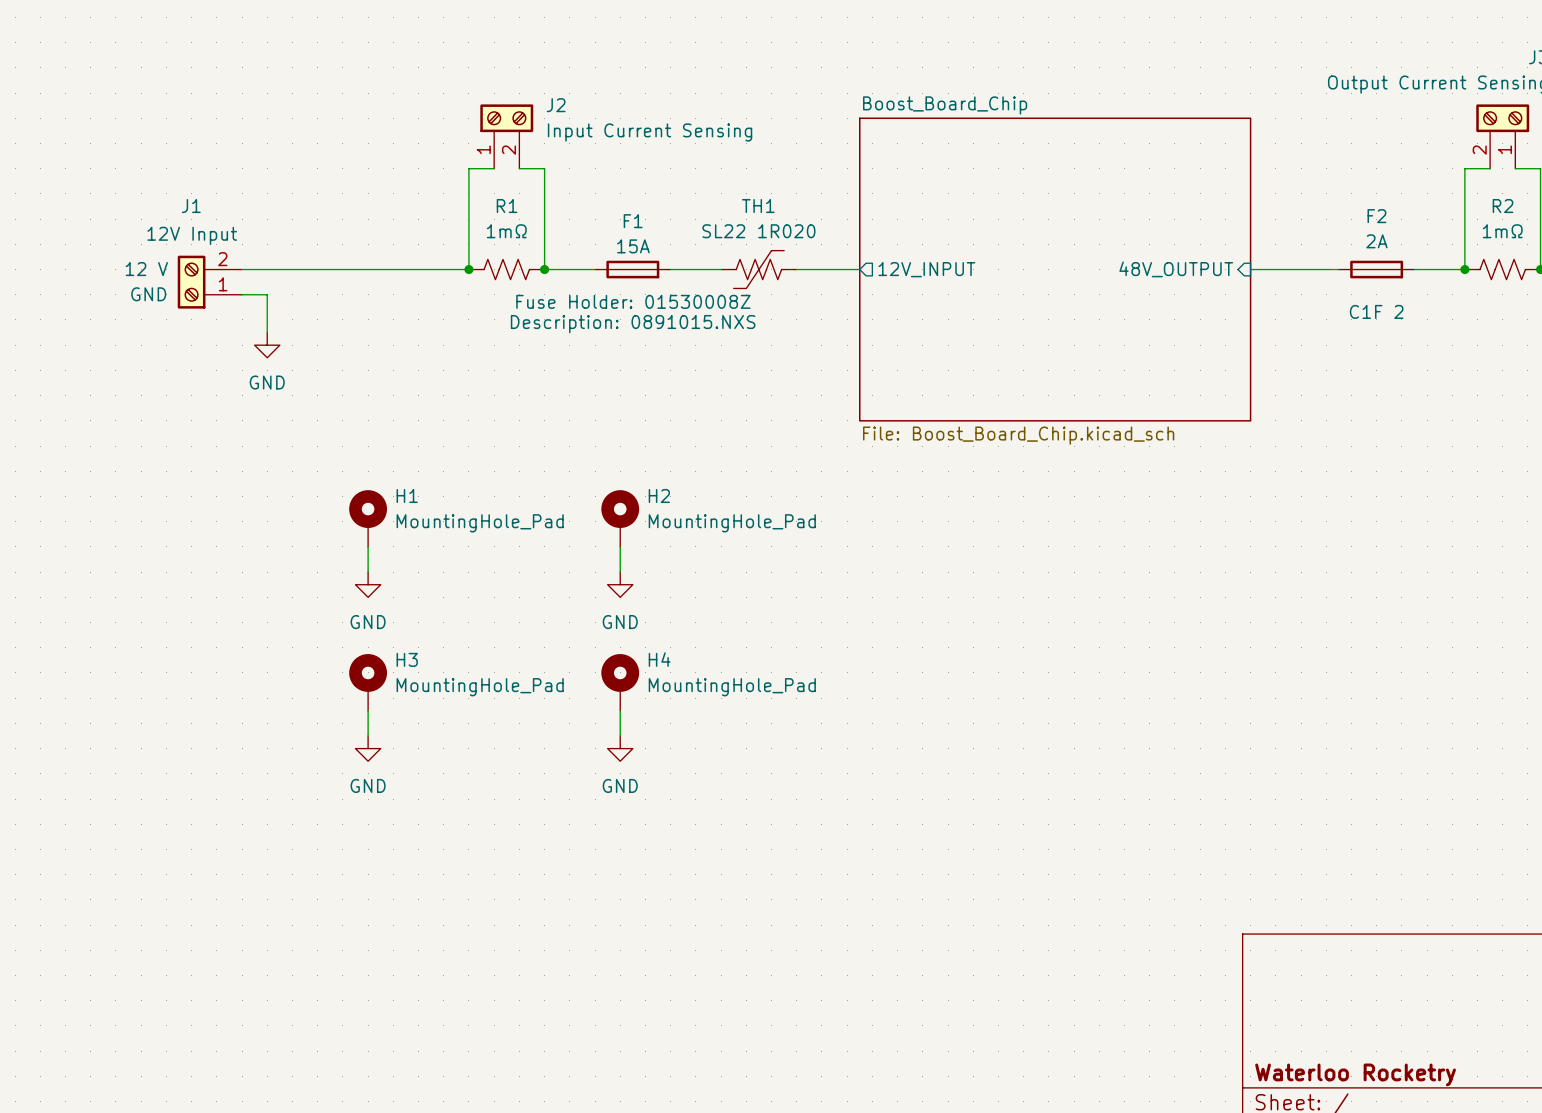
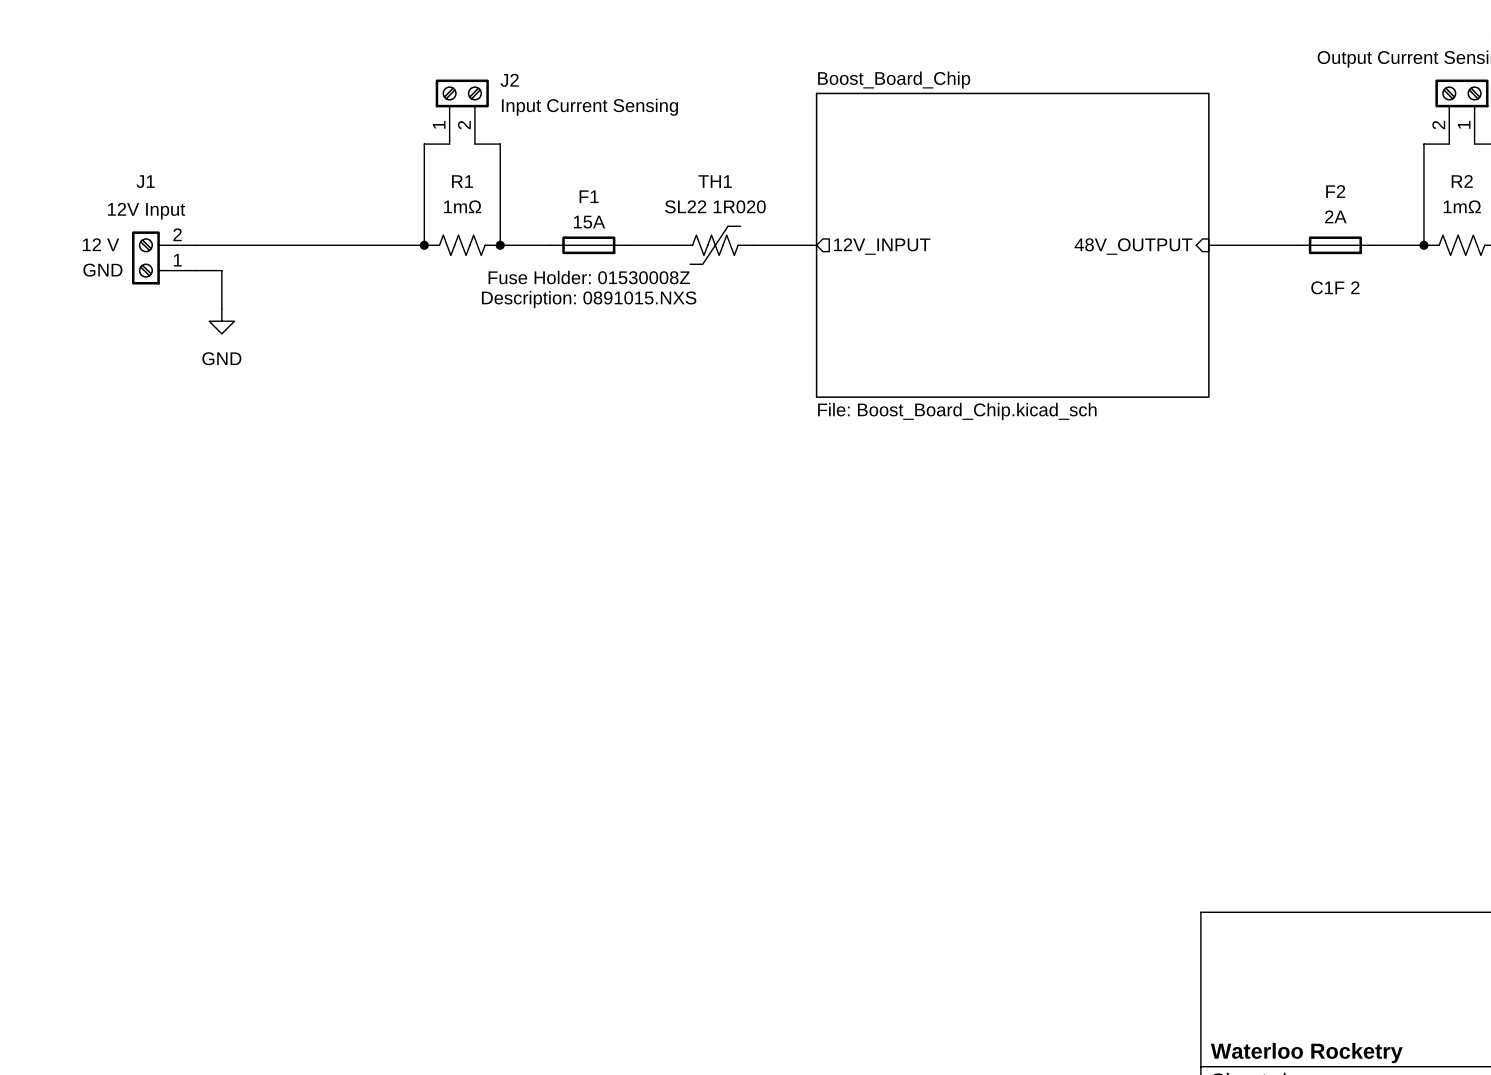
H1: MountingHole_Pad (368, 518) -> none
H2: MountingHole_Pad (620, 518) -> none
wire: (368, 546) (368, 572) -> none
wire: (620, 546) (620, 572) -> none
power symbol: GND (368, 584) -> none
power symbol: GND (620, 584) -> none
H3: MountingHole_Pad (368, 682) -> none
H4: MountingHole_Pad (620, 682) -> none
wire: (368, 710) (368, 736) -> none
wire: (620, 710) (620, 736) -> none
power symbol: GND (368, 748) -> none
power symbol: GND (620, 748) -> none

